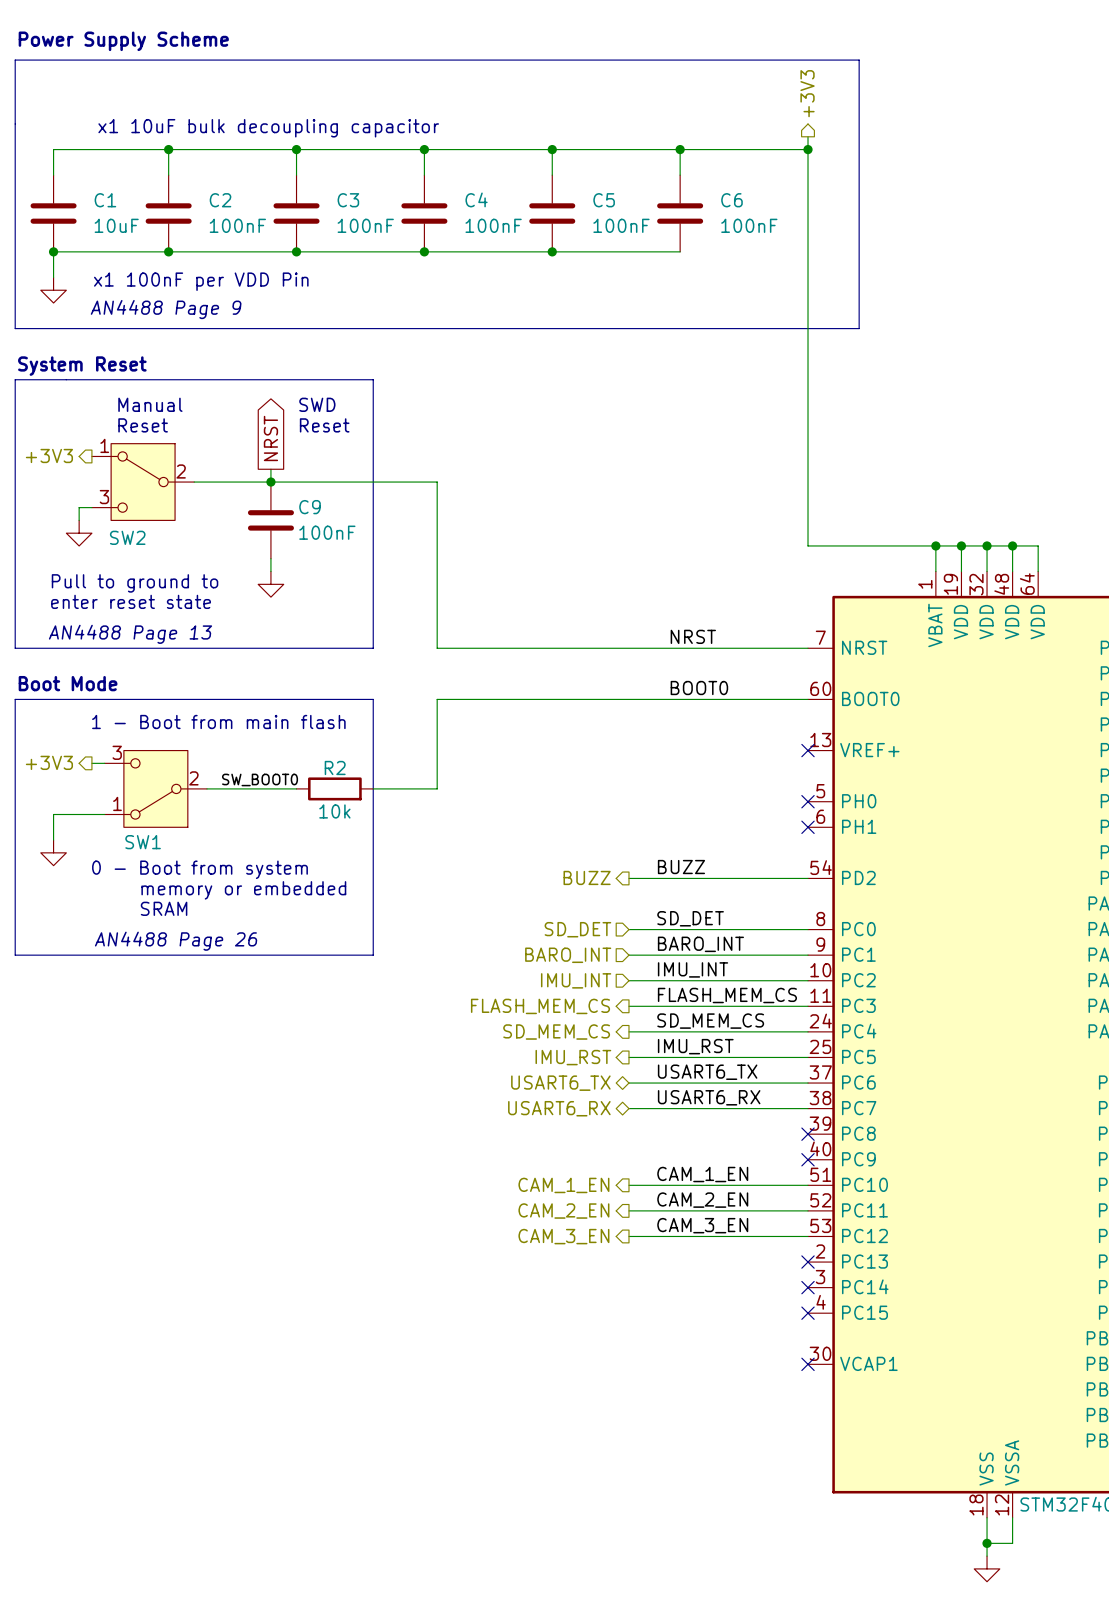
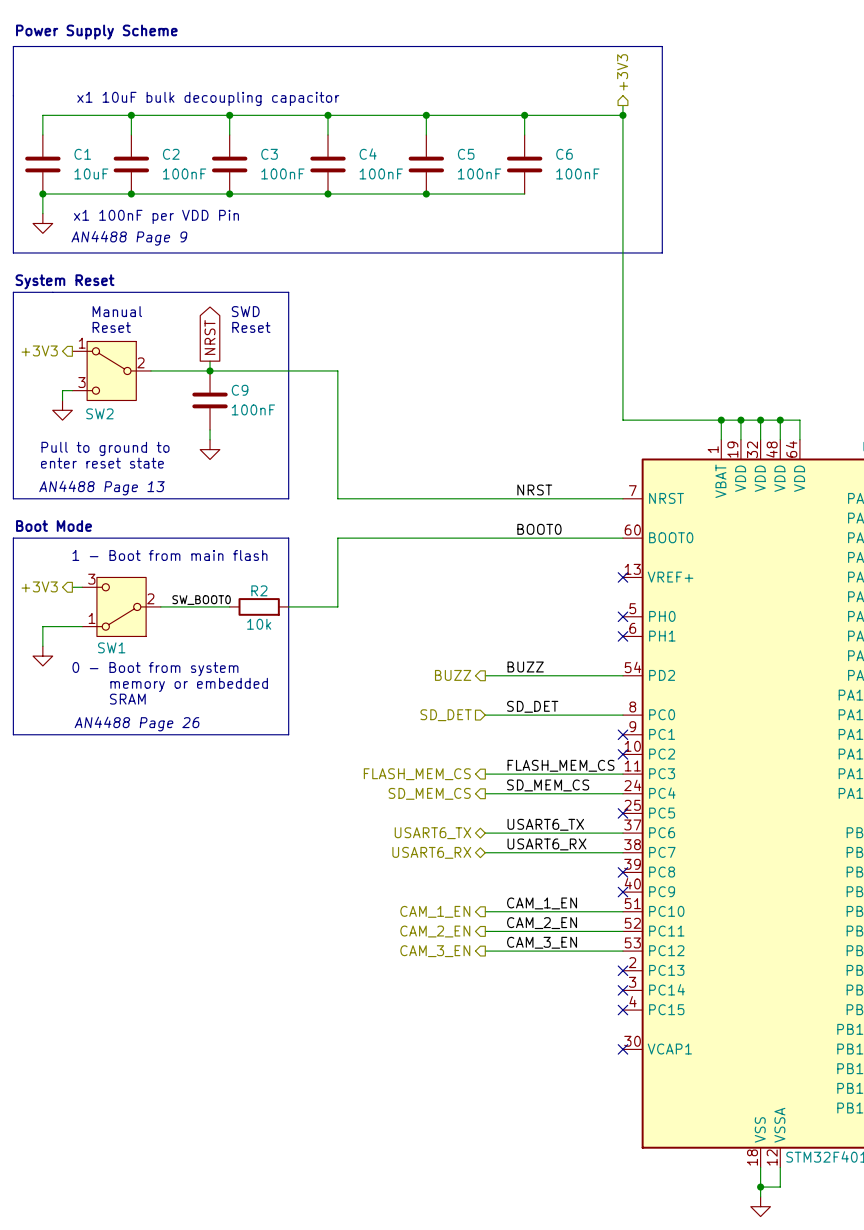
label: BARO_INT (700, 944) -> none
hierarchical label: BARO_INT (568, 955) -> none
wire: (628, 955) (808, 955) -> none
no-connect mark: none -> (622, 734)
label: IMU_INT (693, 969) -> none
hierarchical label: IMU_INT (576, 980) -> none
wire: (628, 980) (808, 980) -> none
no-connect mark: none -> (622, 754)
label: IMU_RST (695, 1046) -> none
hierarchical label: IMU_RST (573, 1057) -> none
wire: (628, 1057) (808, 1057) -> none
no-connect mark: none -> (622, 813)

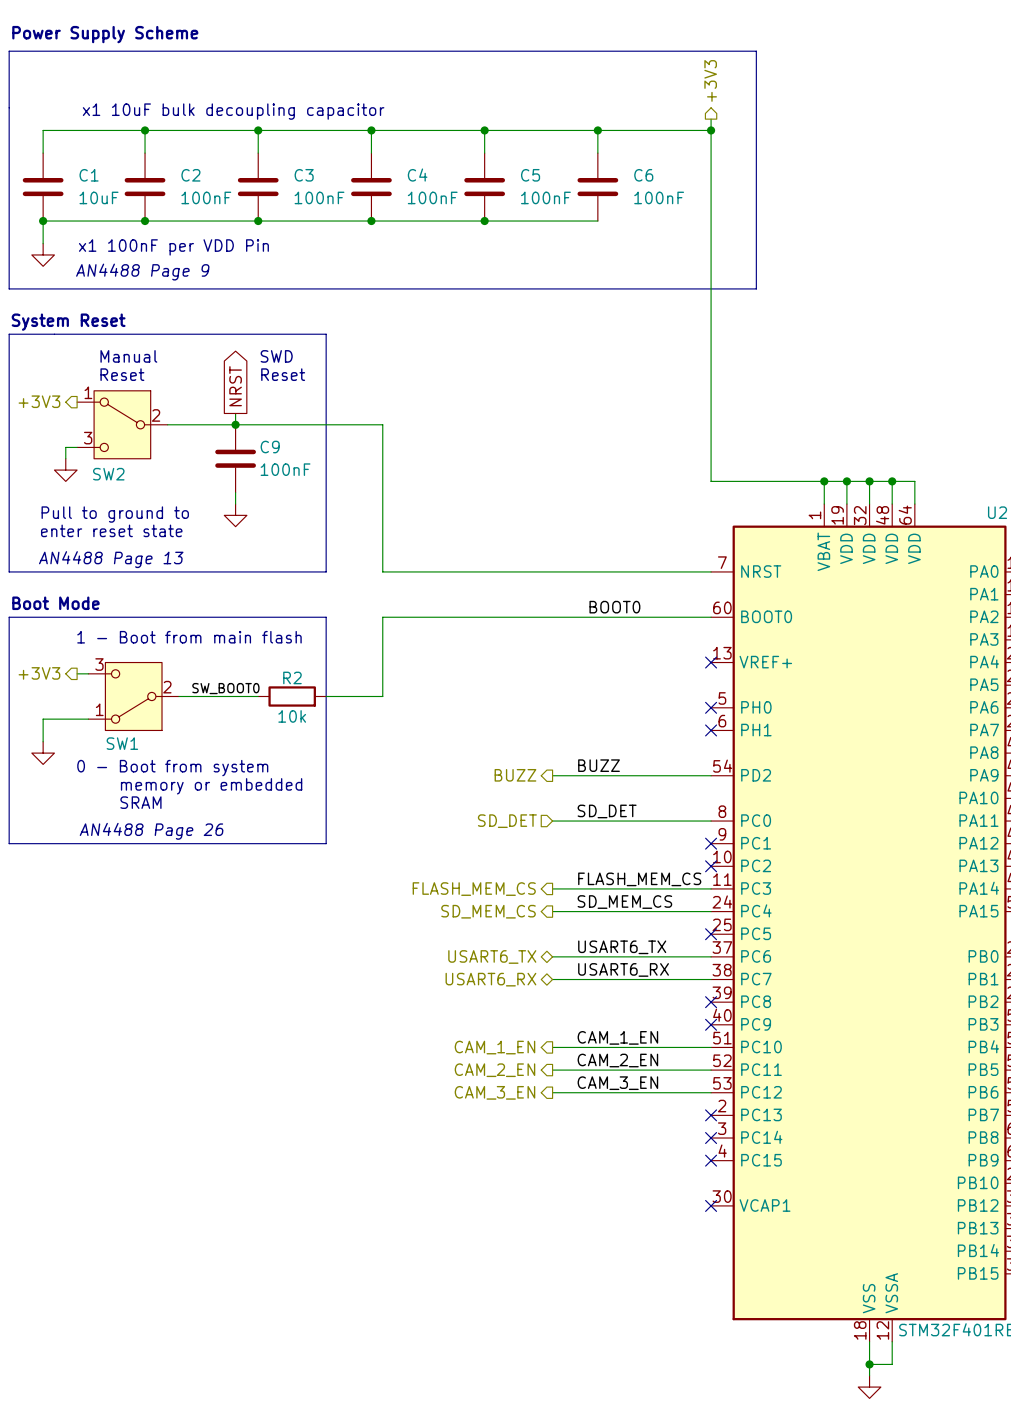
label: NRST (534, 490) -> none

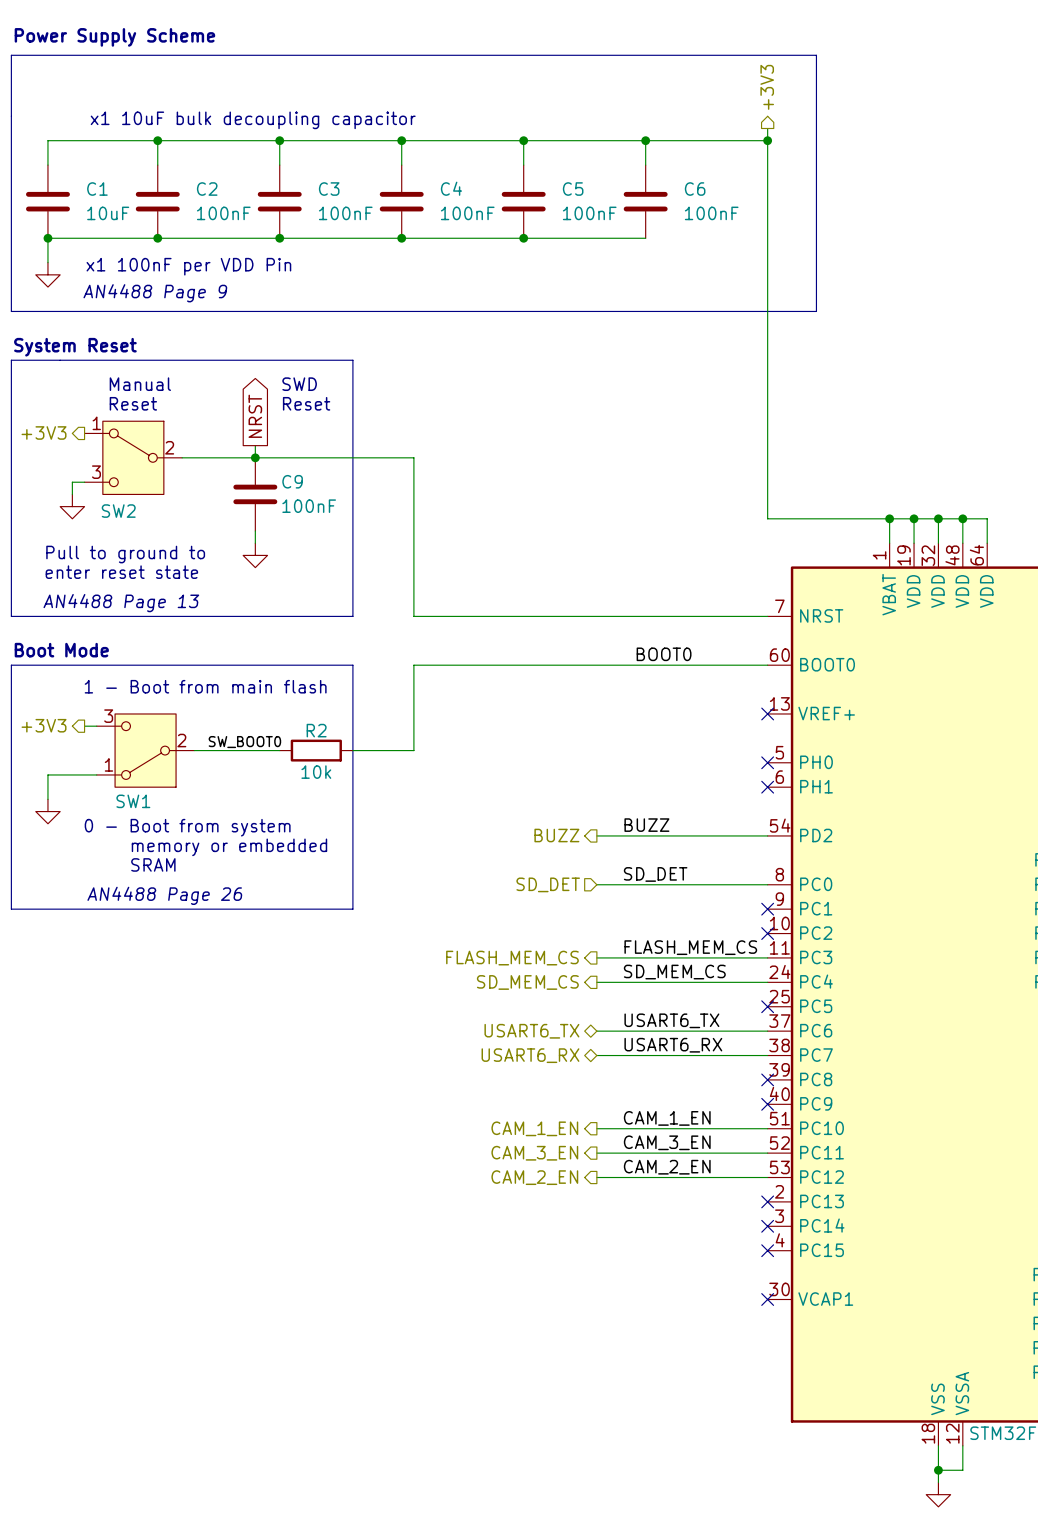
label: CAM_2_EN (617, 1060) -> CAM_3_EN (667, 1142)
hierarchical label: CAM_2_EN (494, 1070) -> CAM_3_EN (534, 1153)
label: CAM_3_EN (617, 1083) -> CAM_2_EN (667, 1167)
hierarchical label: CAM_3_EN (494, 1092) -> CAM_2_EN (534, 1177)

